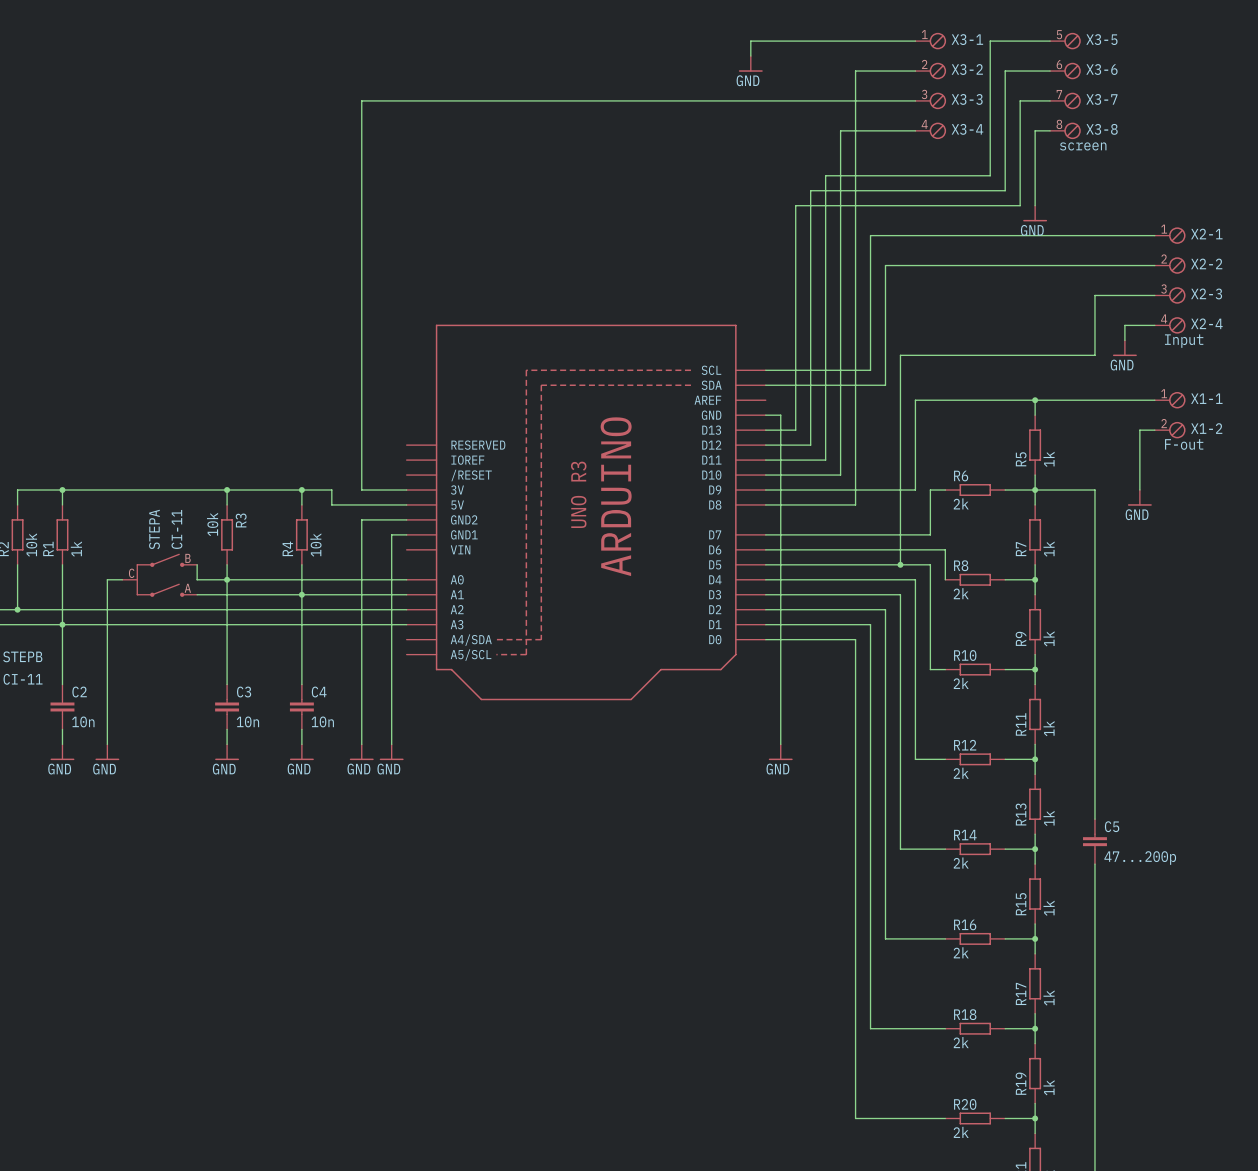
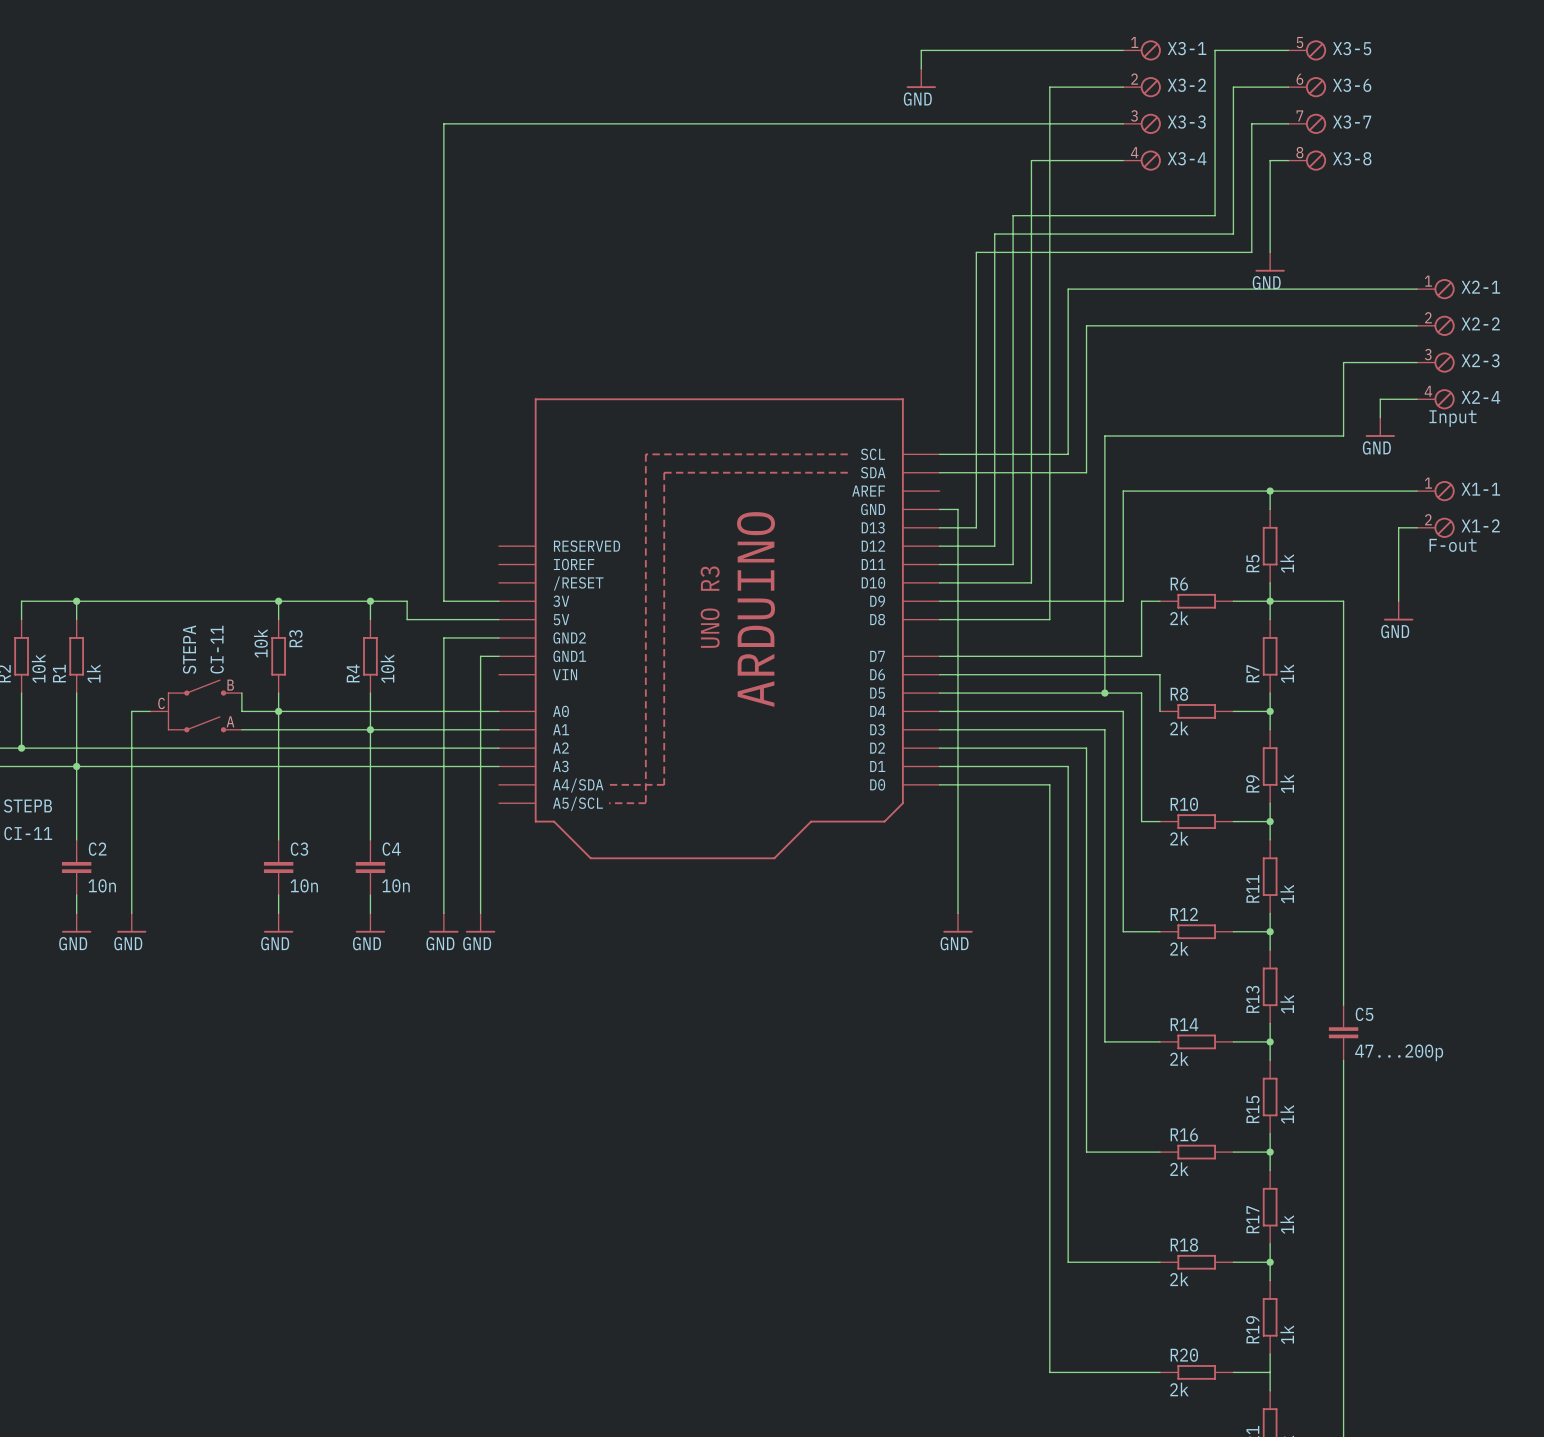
X3-8 value: screen (1083, 146) -> none
junction: (1035, 1118) -> none

